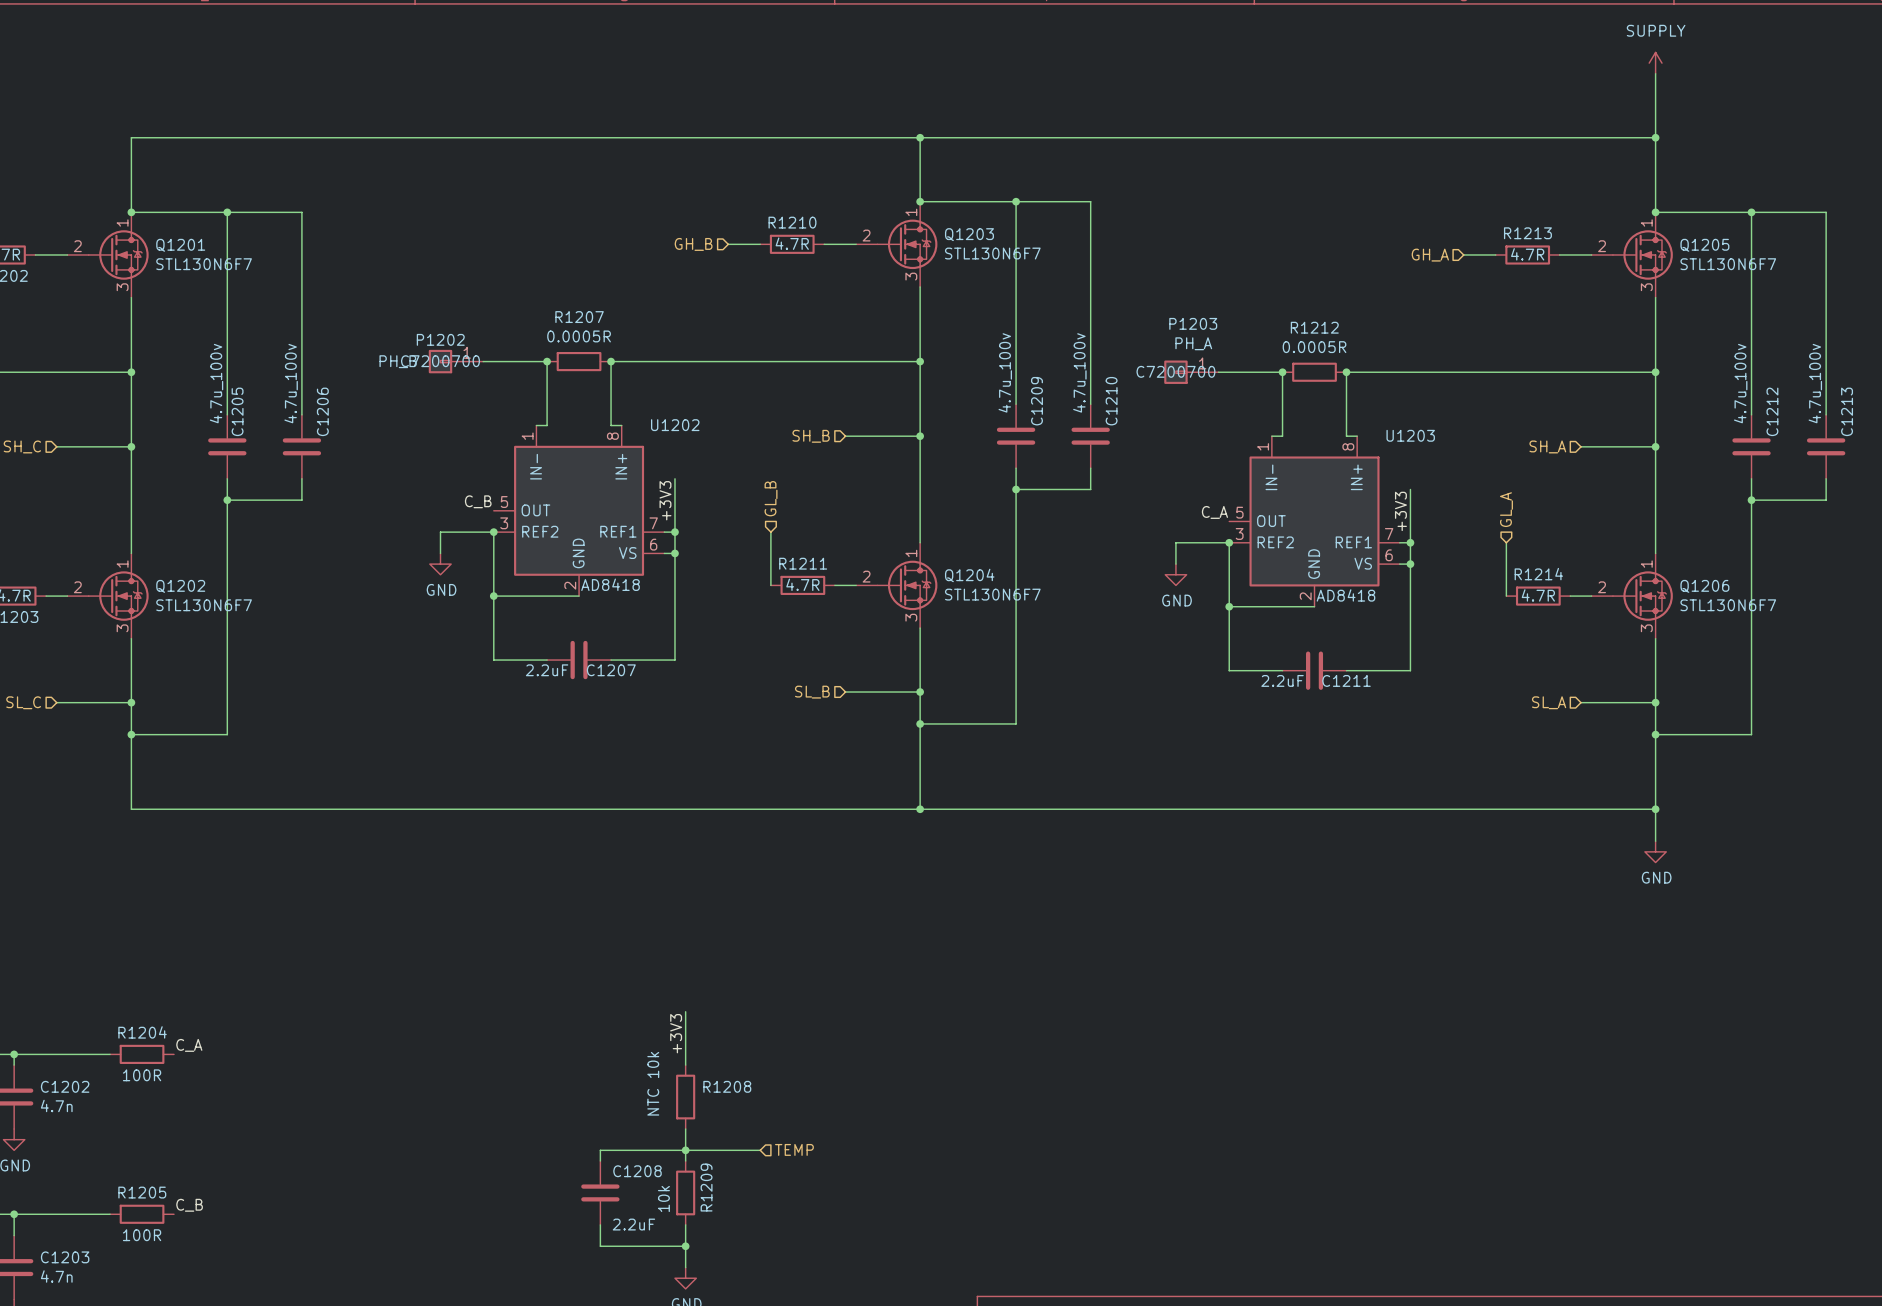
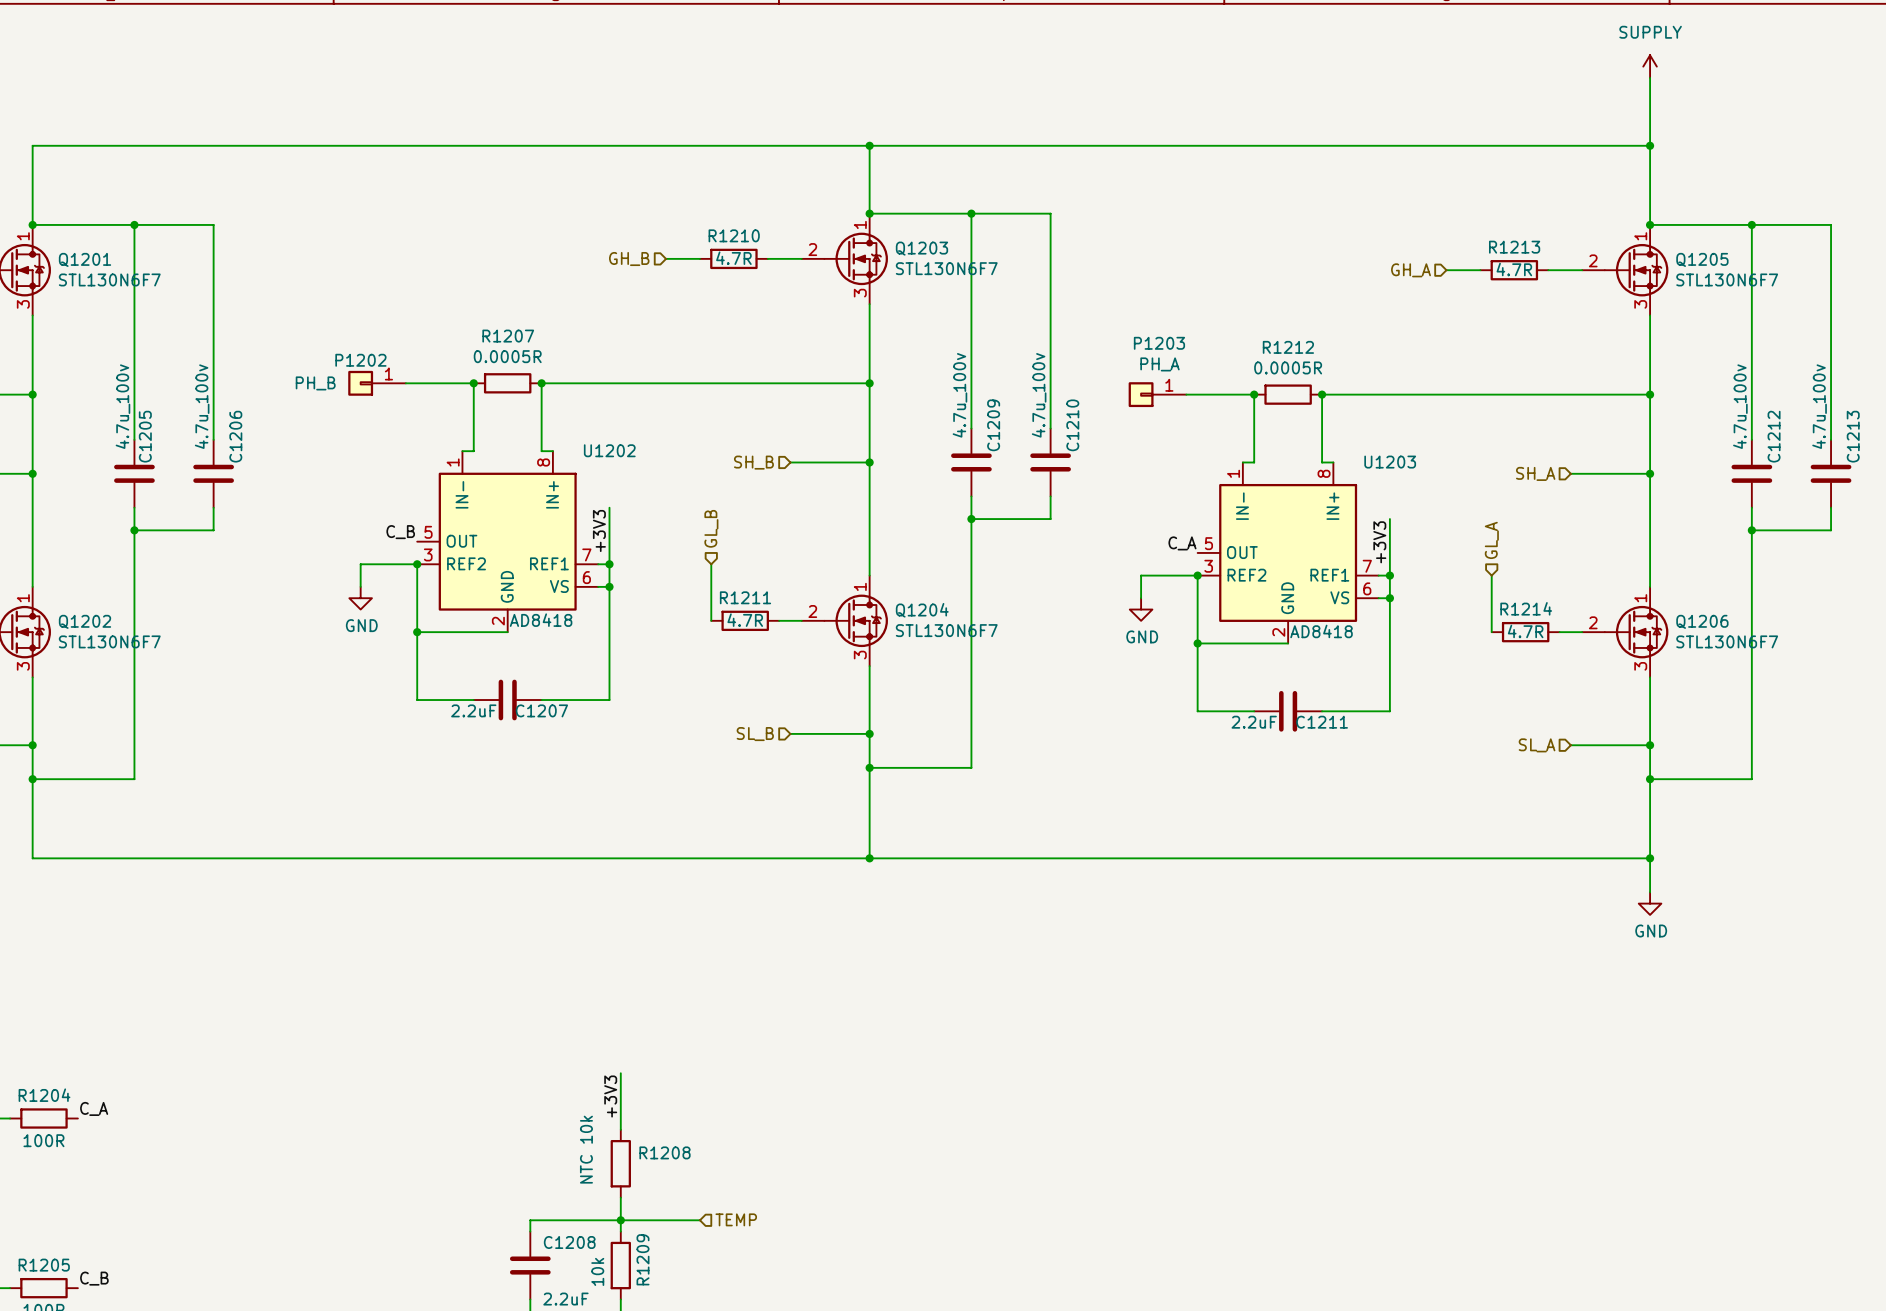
P1202 text: C7200700 (440, 361) -> none
P1203 text: C7200700 (1175, 371) -> none

